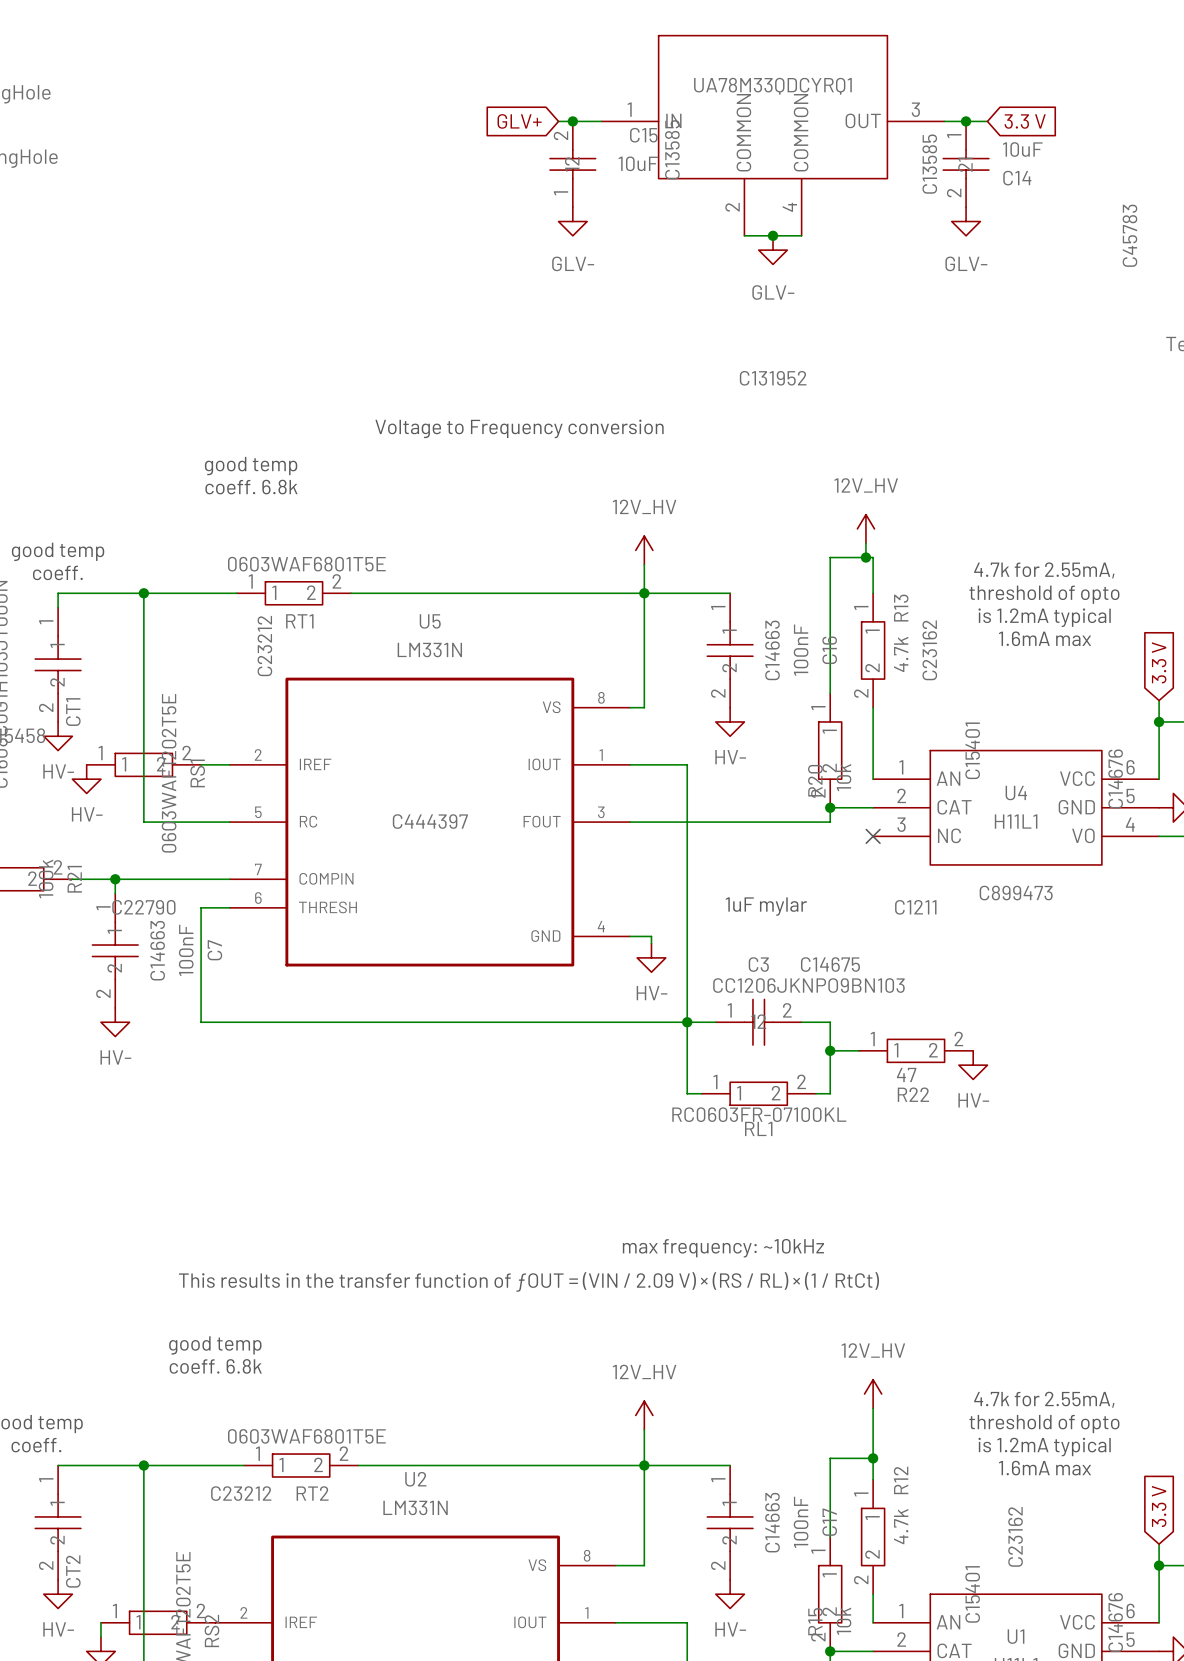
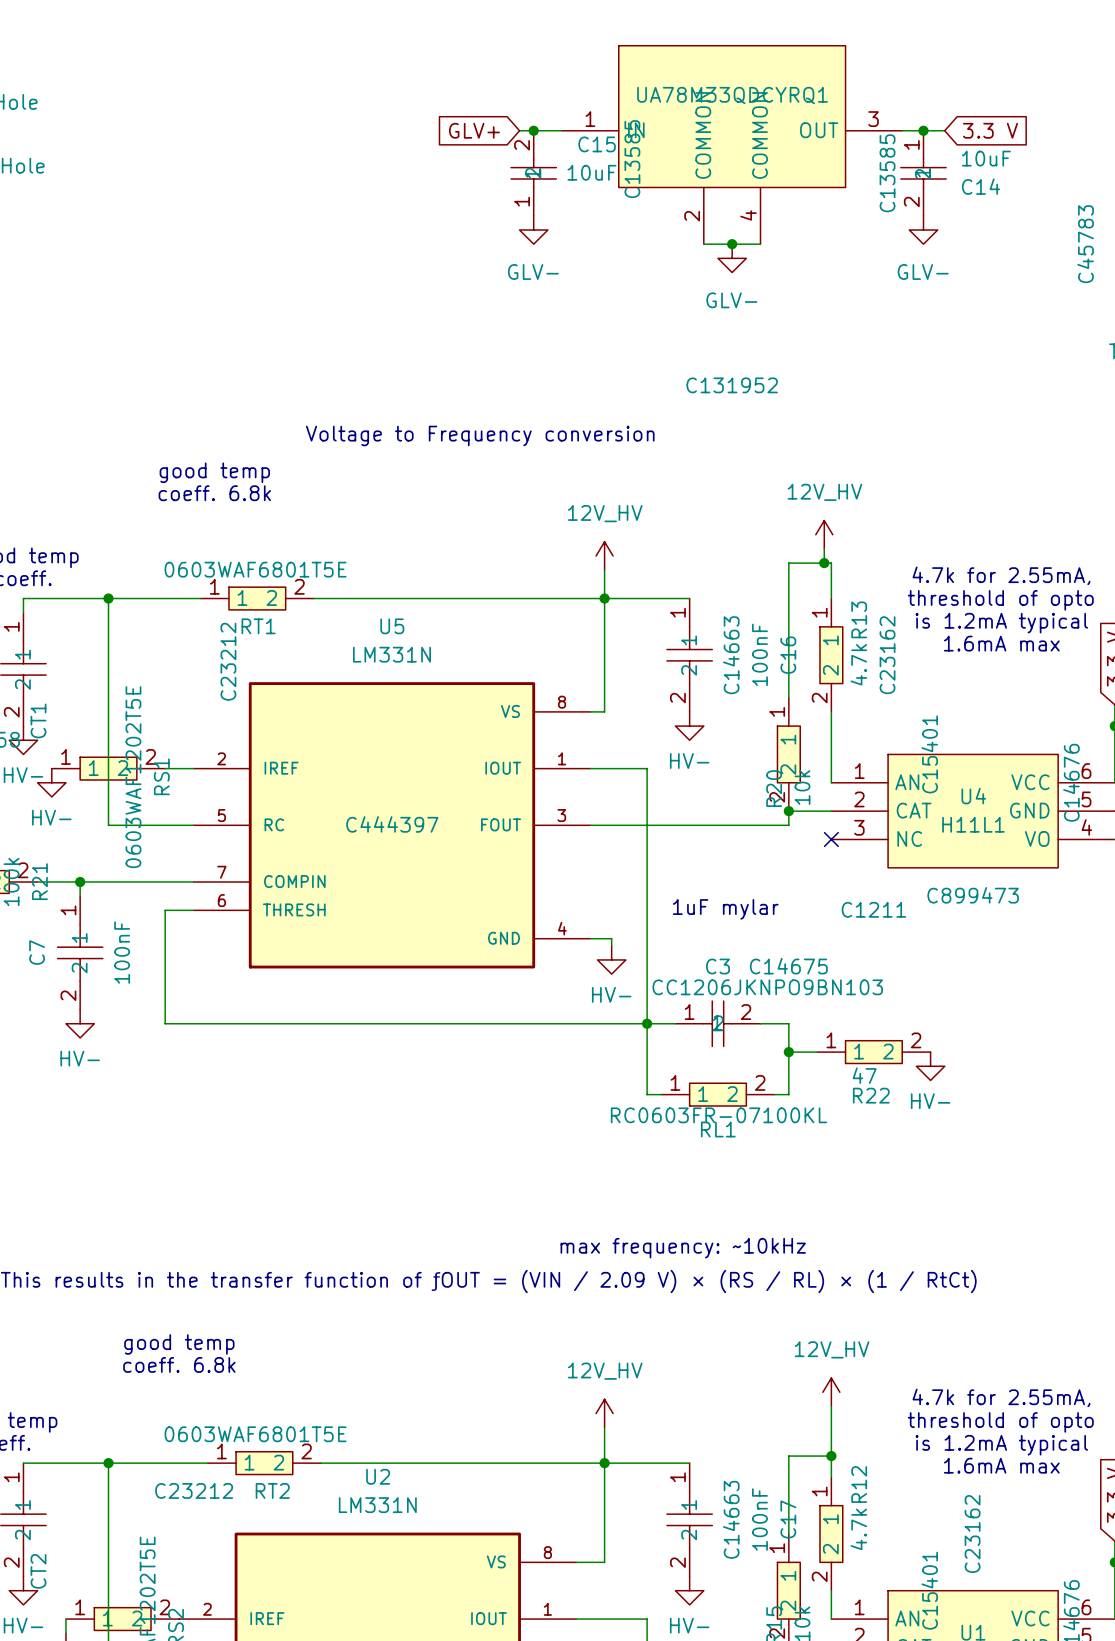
RS1 text: C22790 (143, 907) -> none
C7 text: C14663 (157, 950) -> none
C7 value position: 100nF (186, 950) -> 100nF (122, 952)
C7 name position: C7 (214, 950) -> C7 (37, 952)

